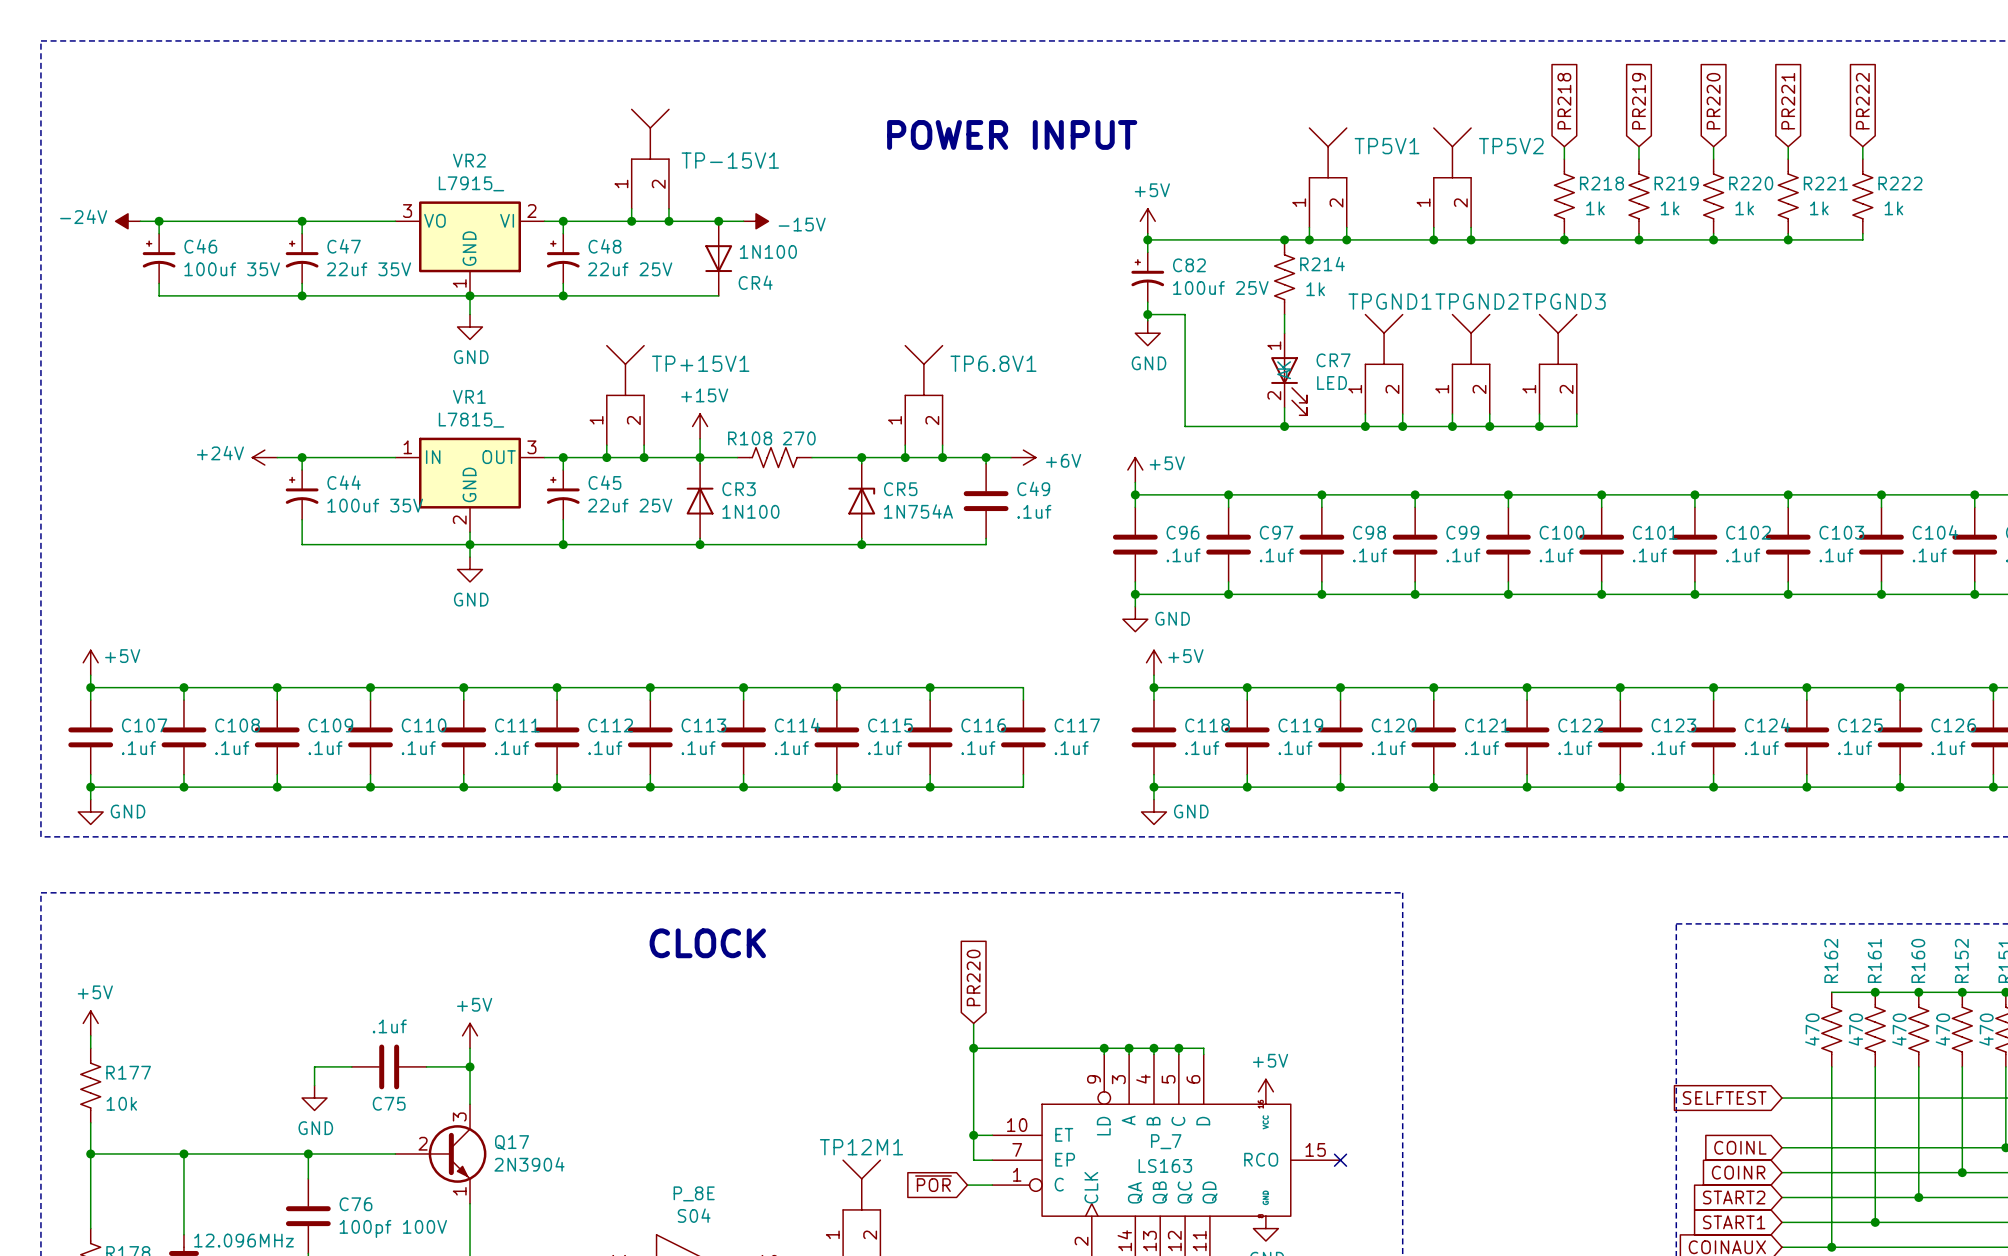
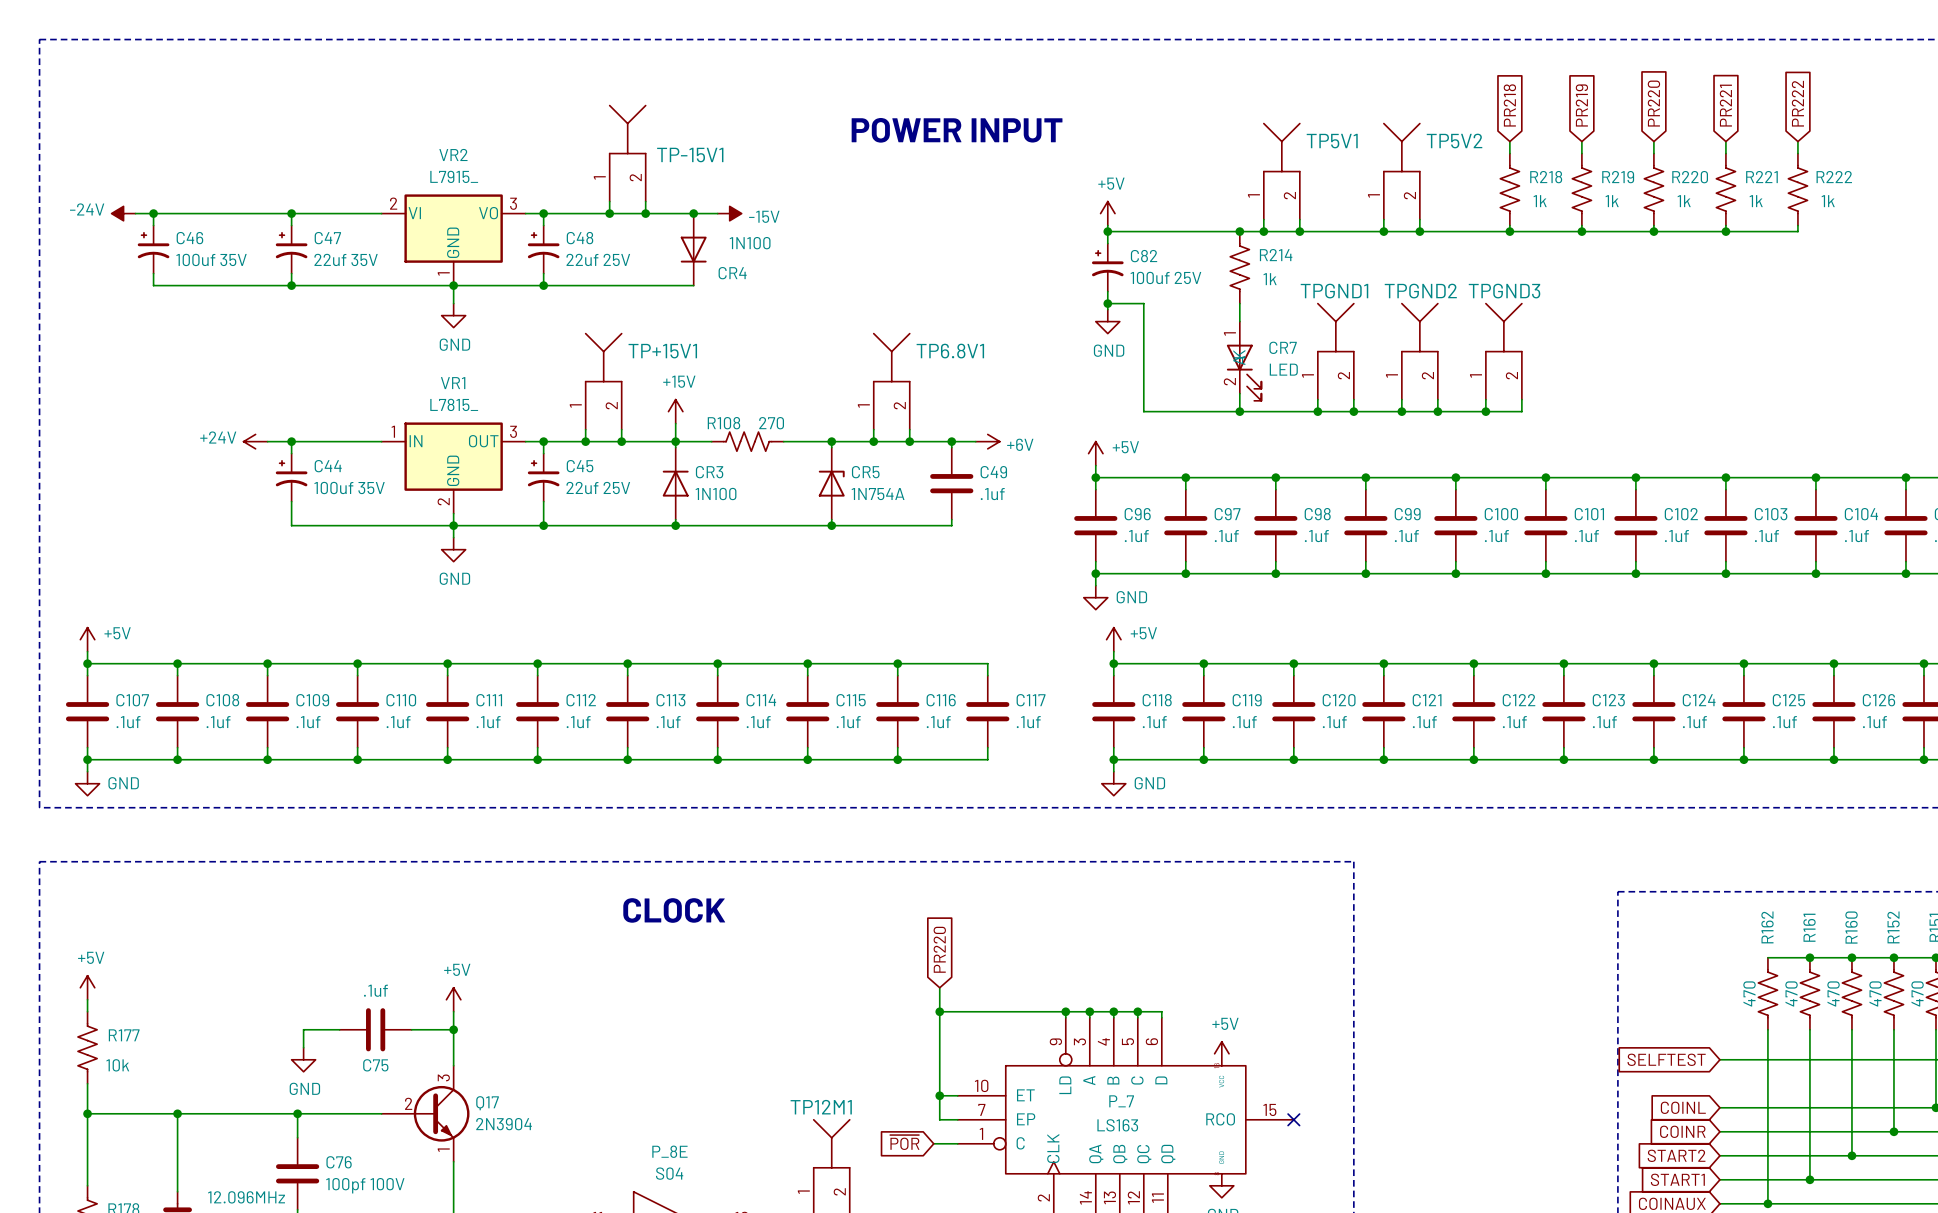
VR2 flip: as is (470, 236) -> left-right (453, 228)

